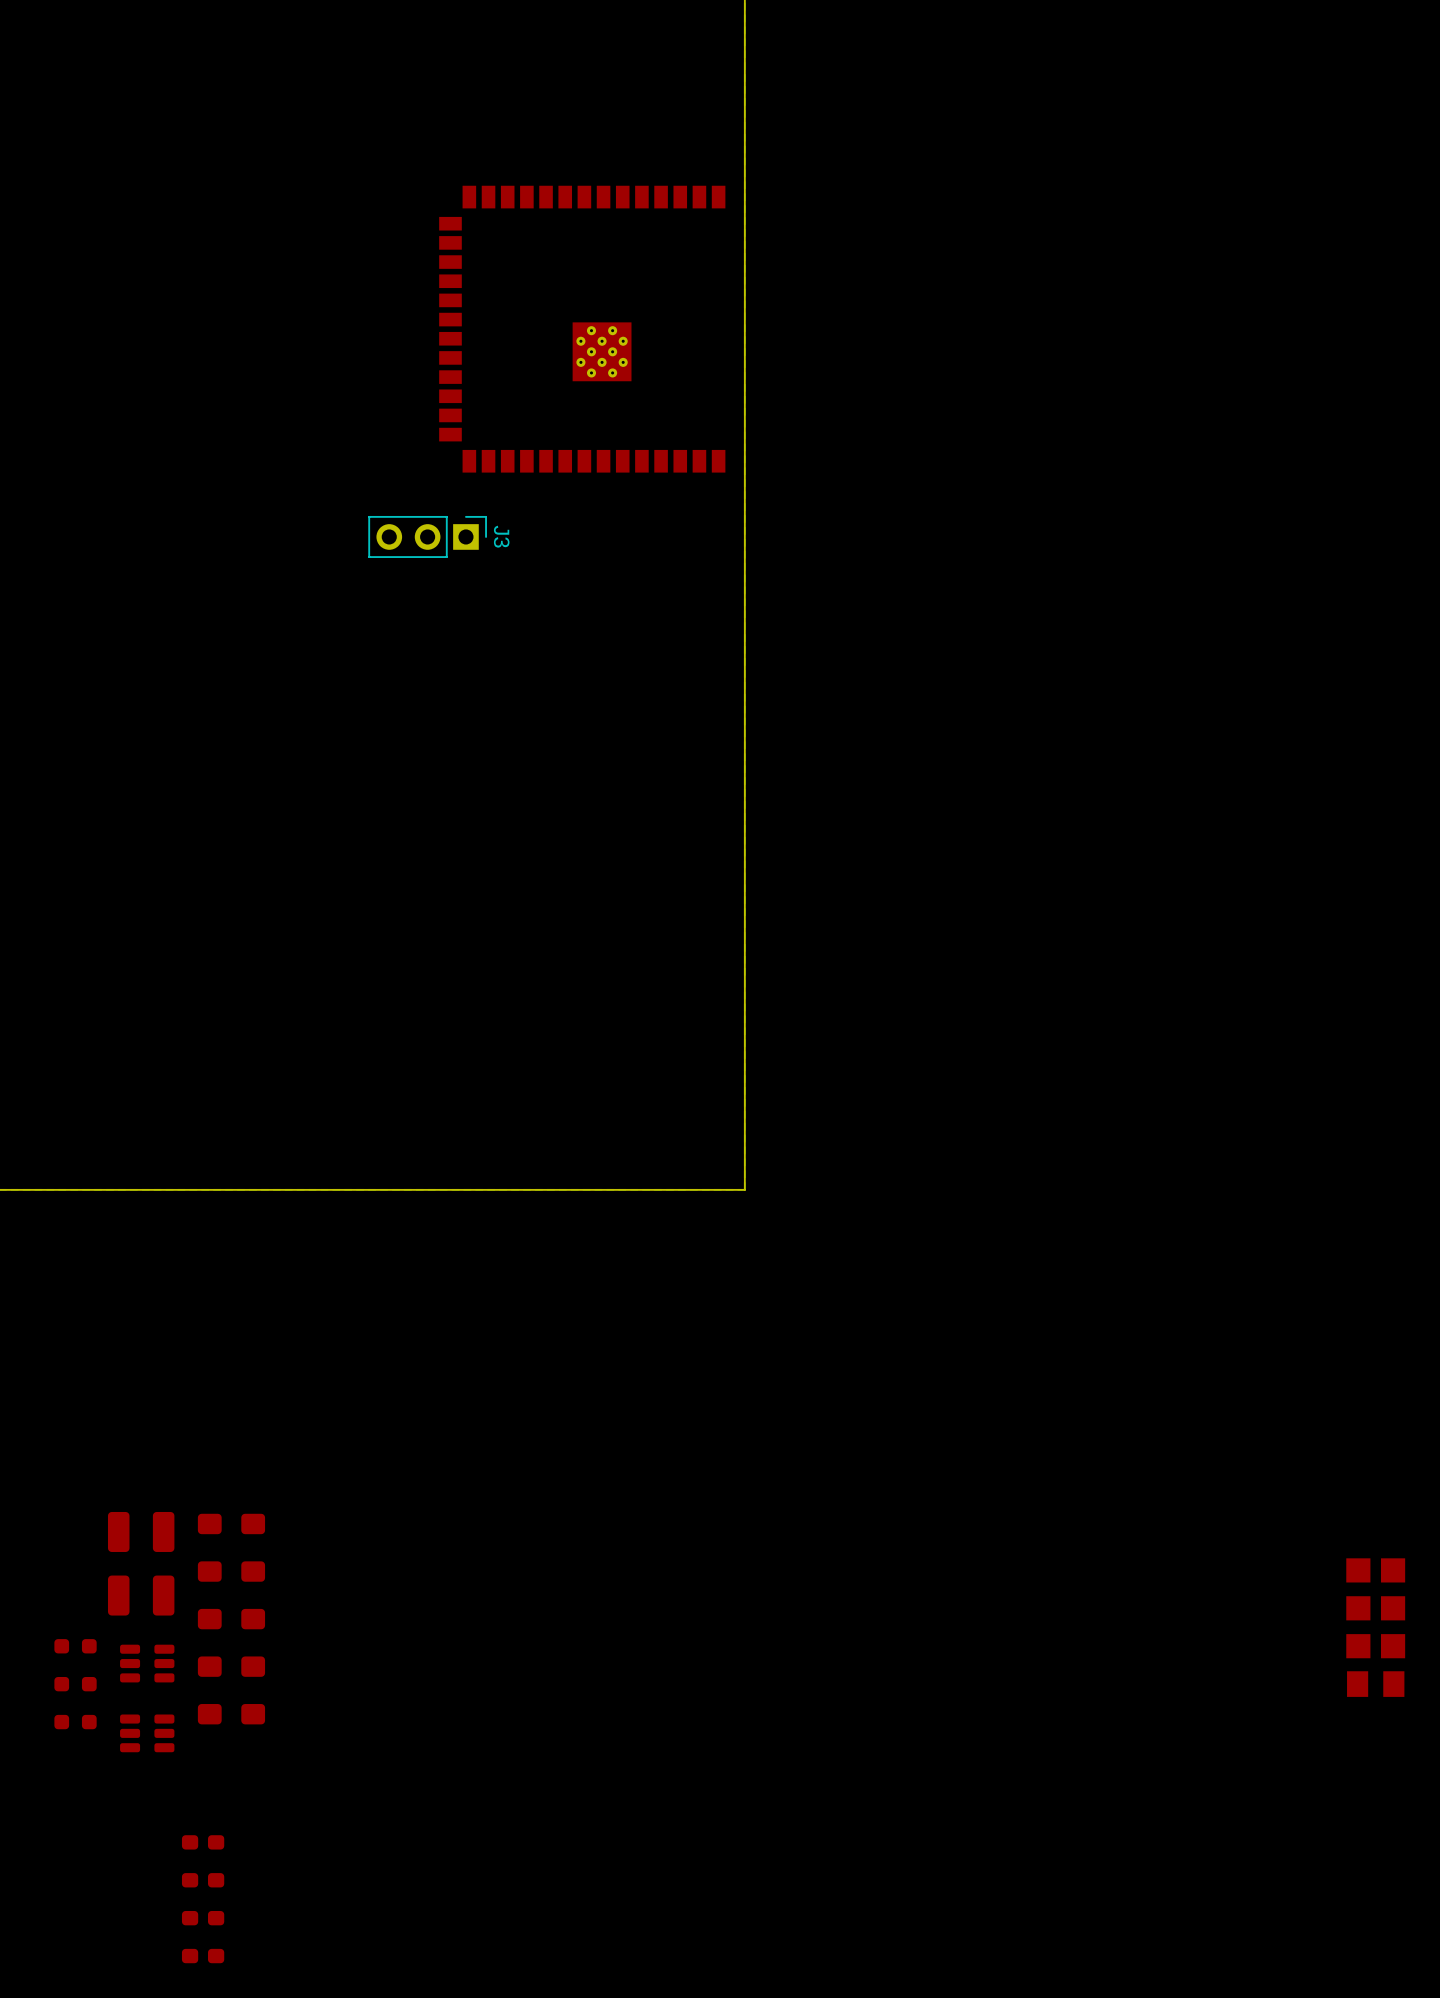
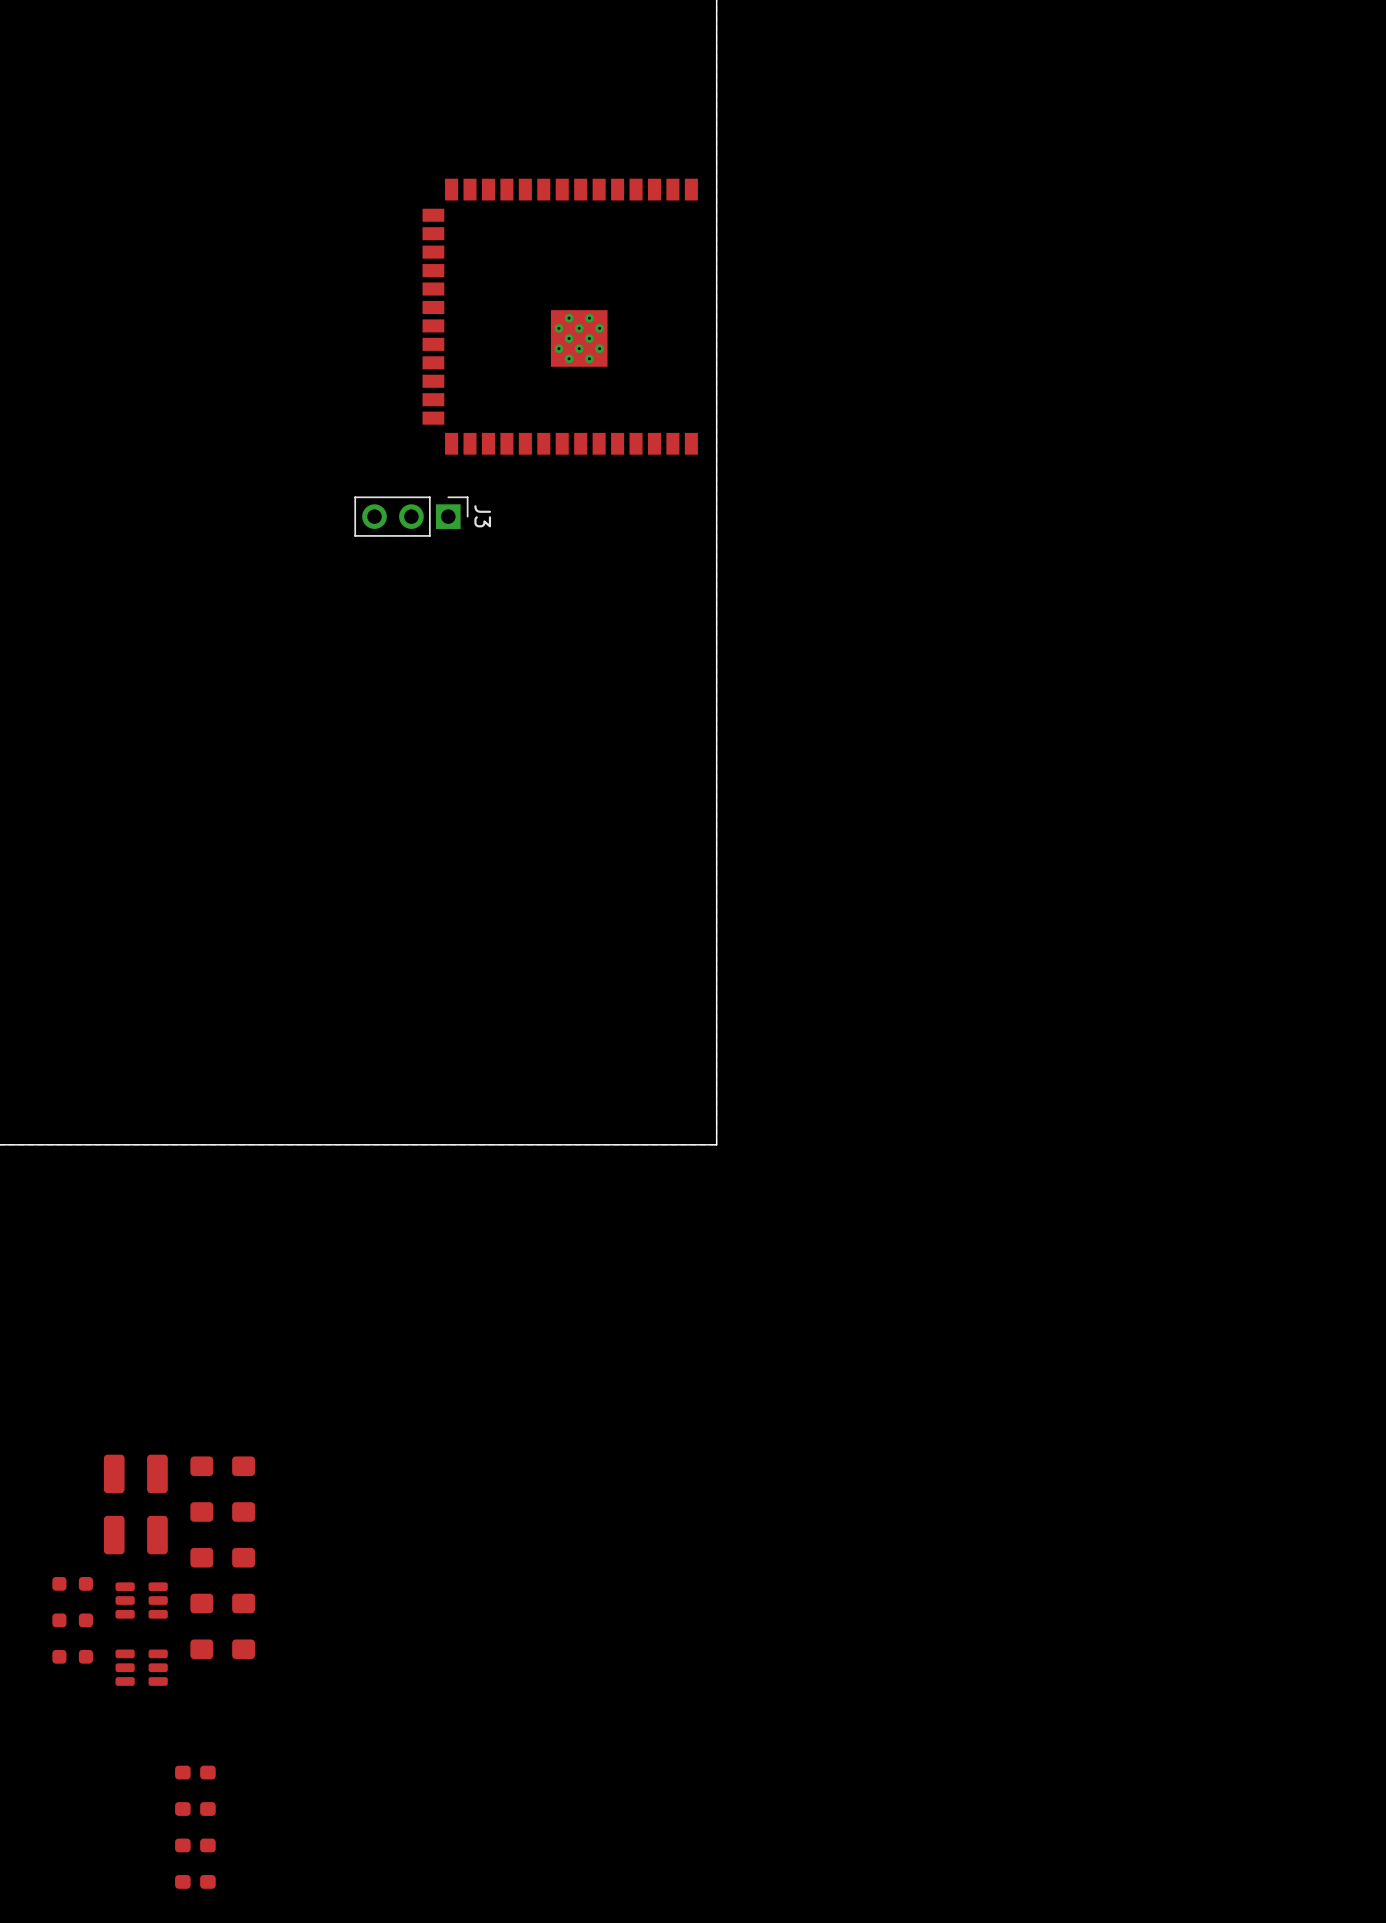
part: (1375, 1570) -> none
part: (1375, 1608) -> none
part: (1375, 1646) -> none
part: (1375, 1684) -> none

